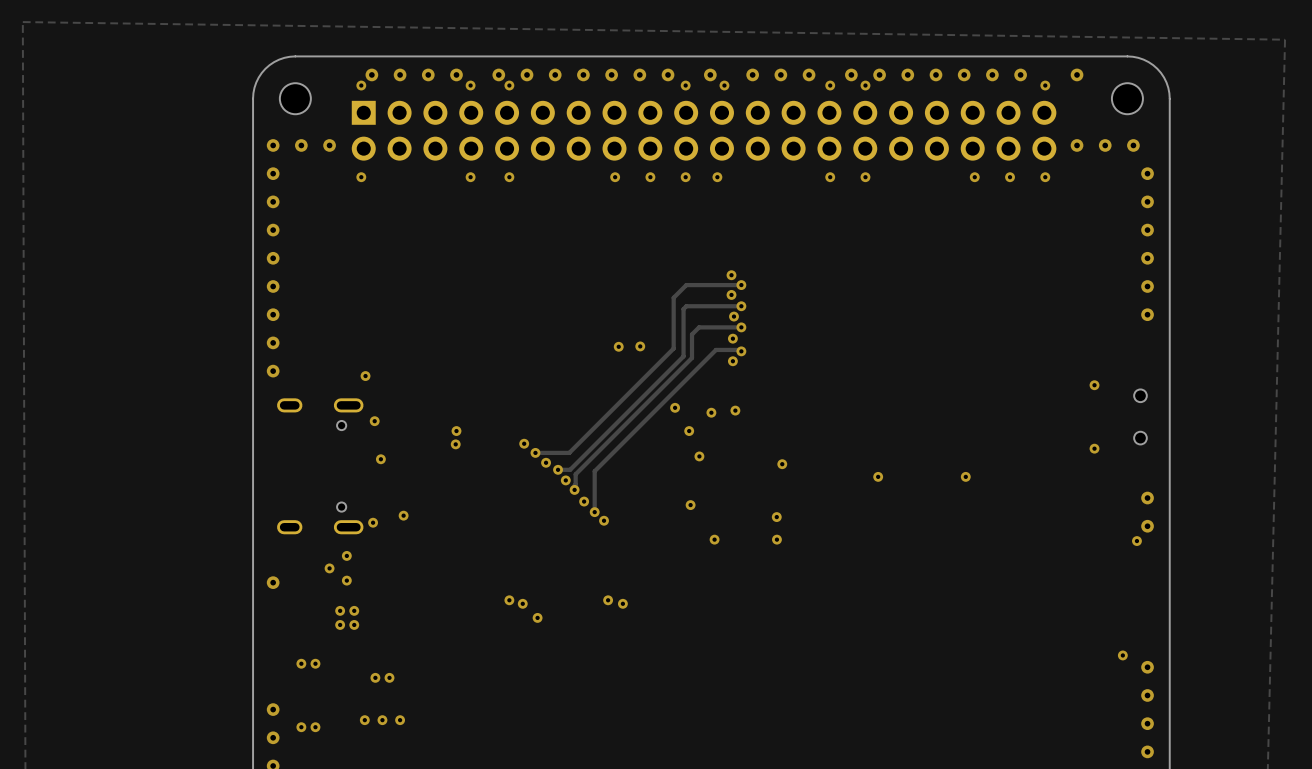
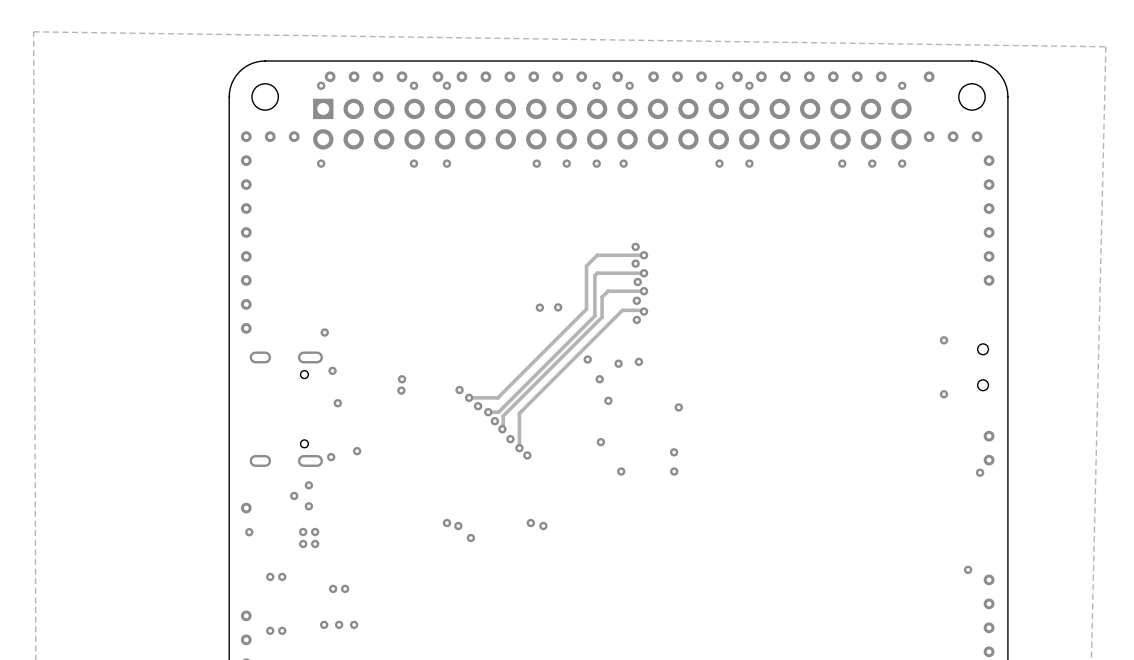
via: (878, 476) -> none
via: (965, 476) -> none
via: none -> (249, 532)

